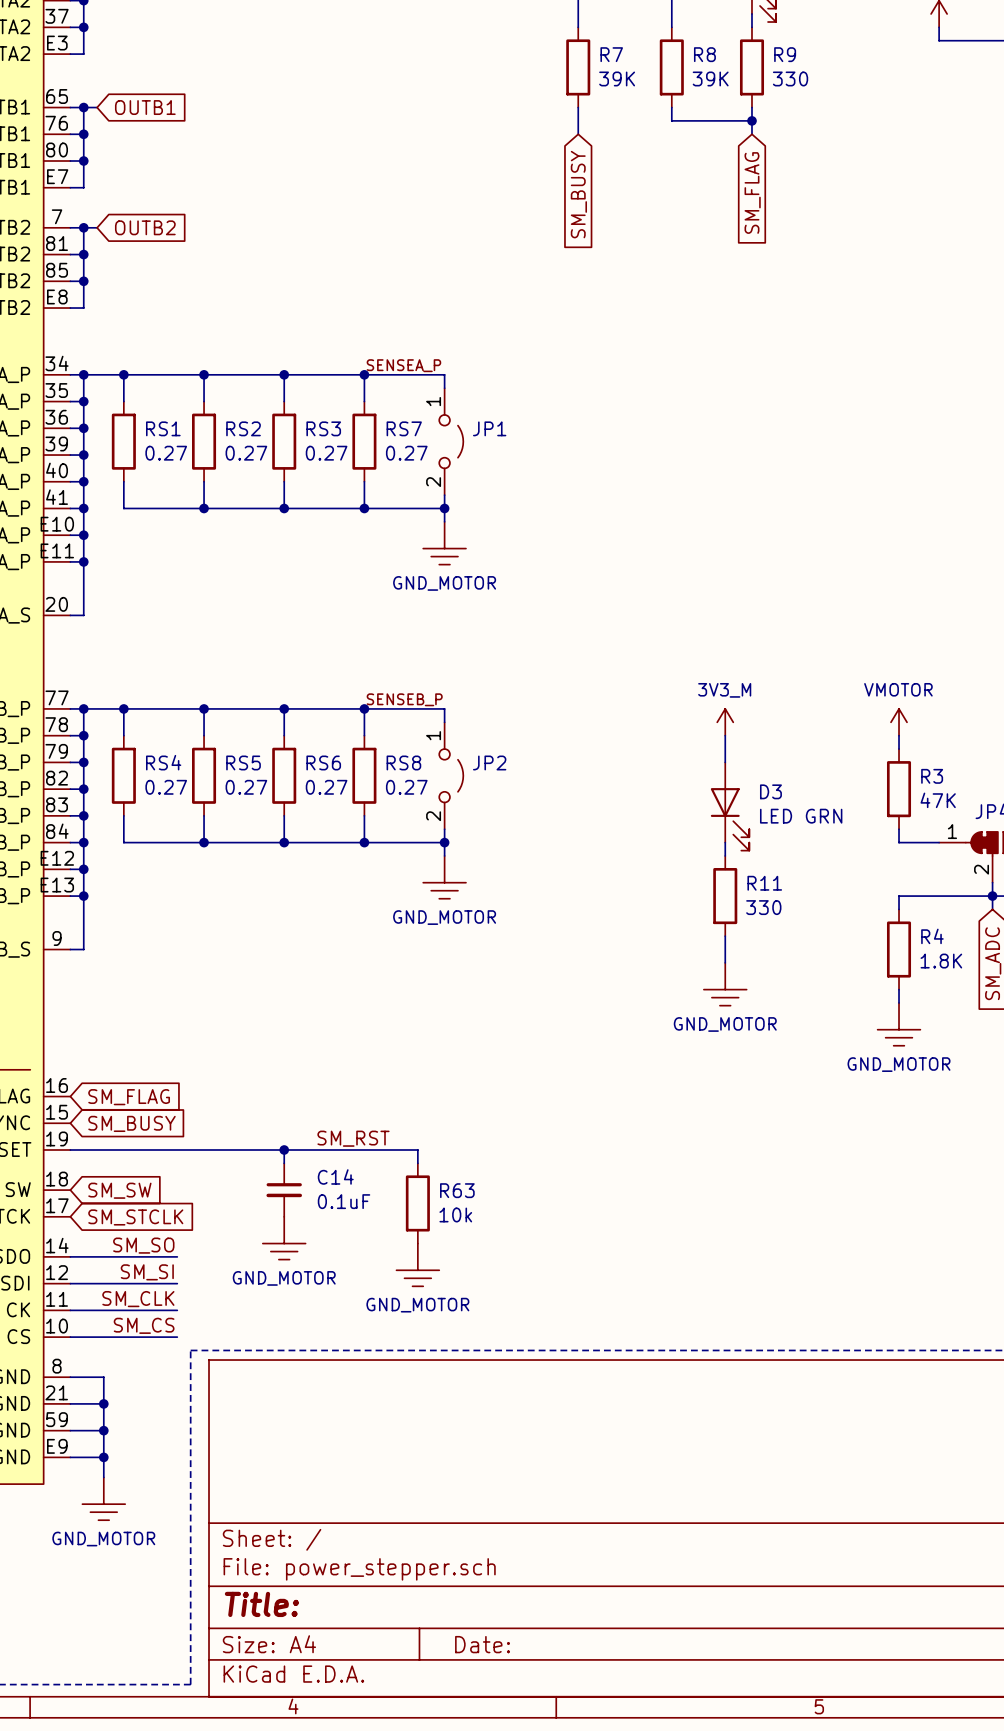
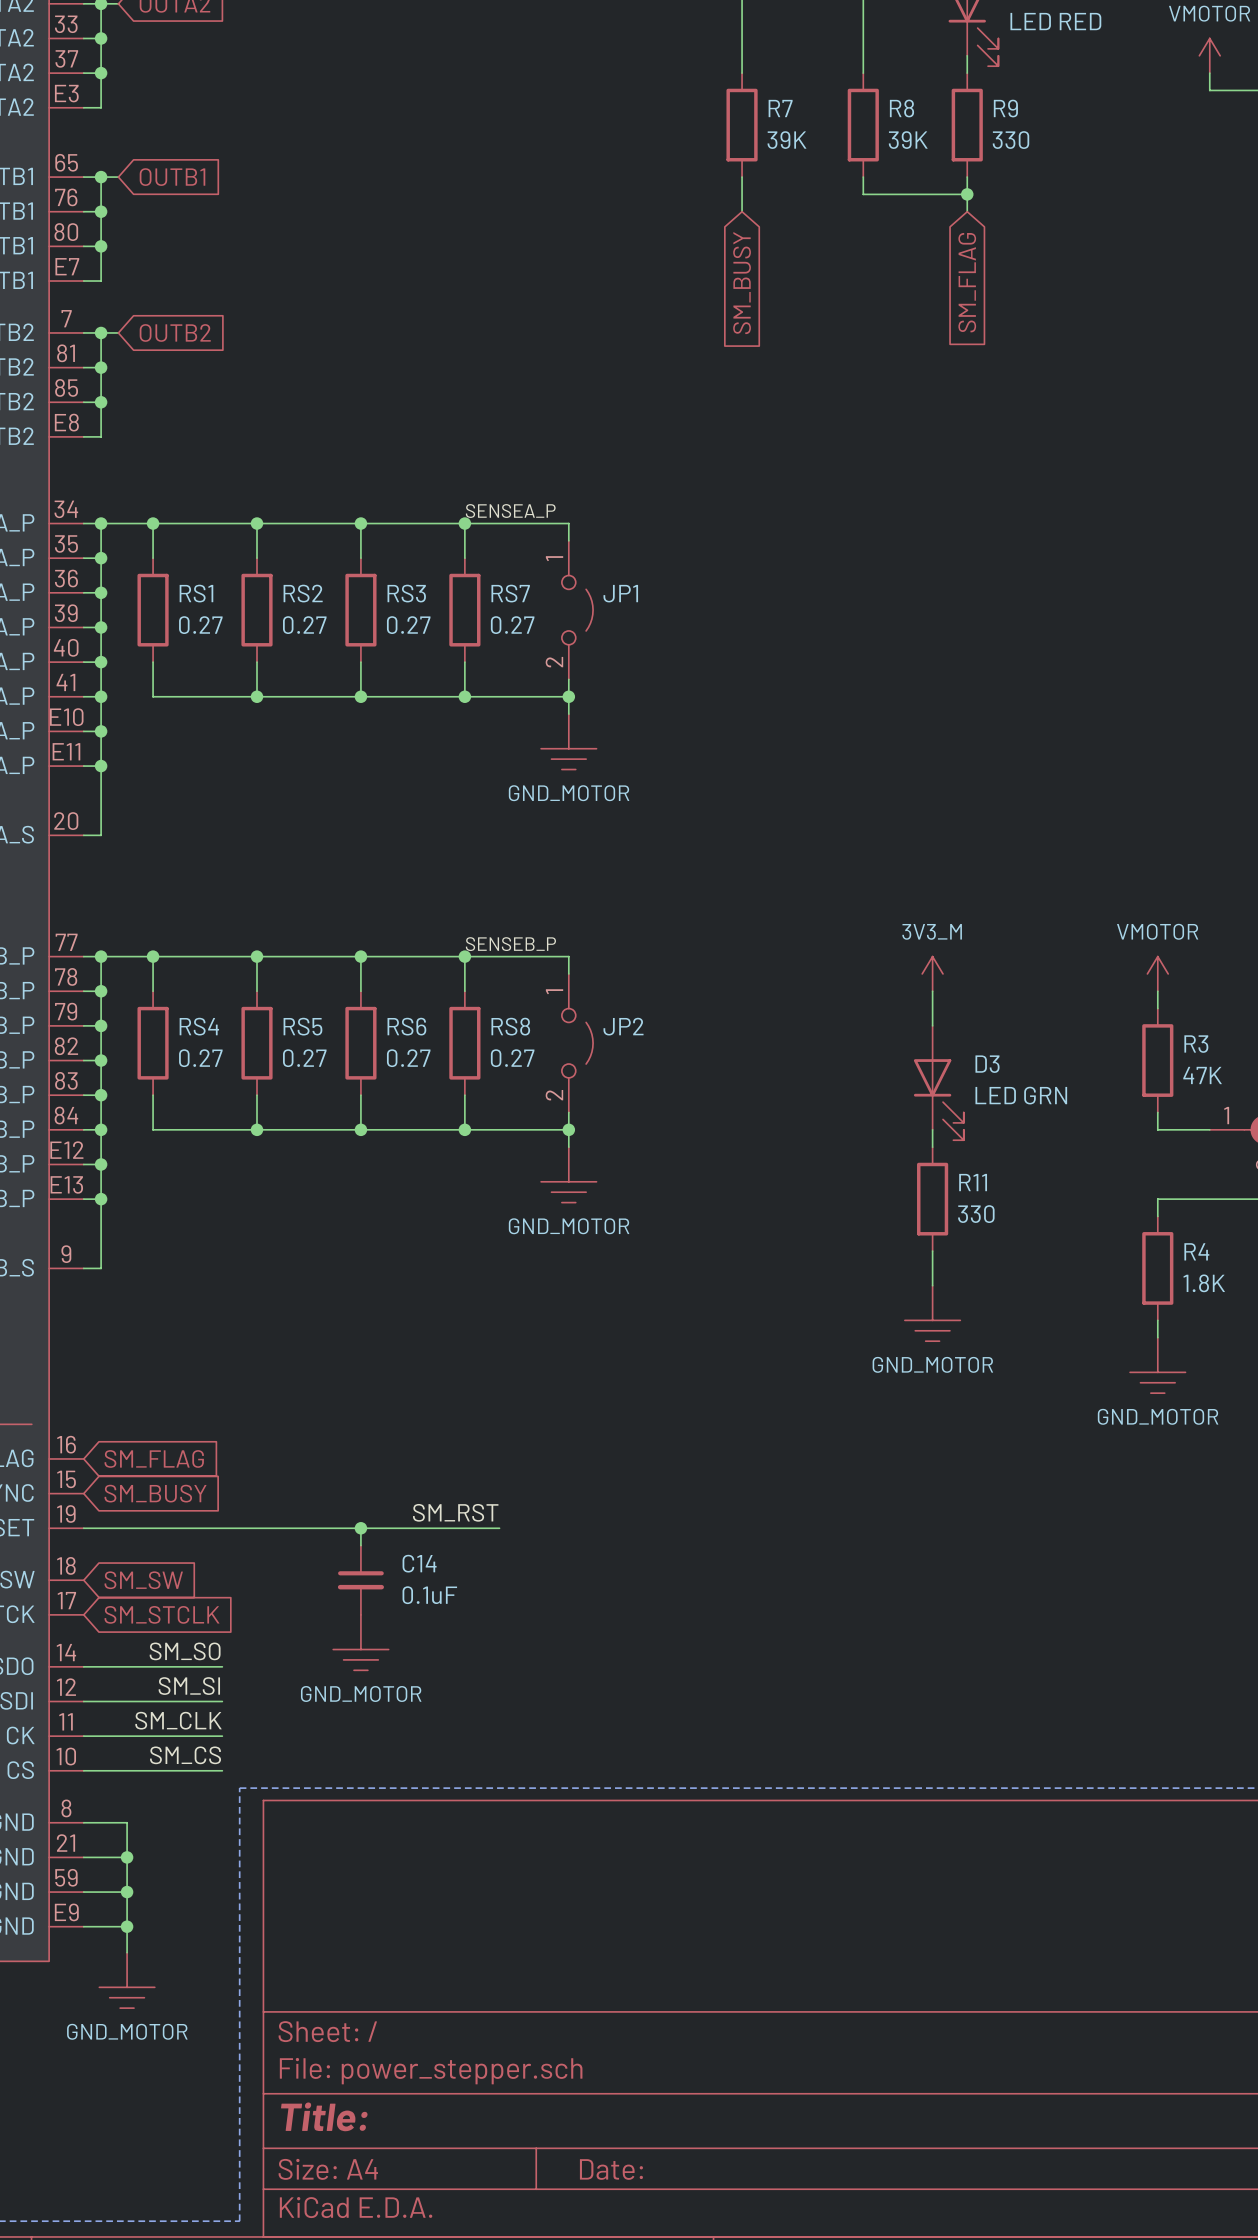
wire: (391, 1149) (417, 1149) (417, 1163) -> none
R63: 10k (417, 1203) -> none
power symbol: GND_MOTOR (417, 1264) -> none

